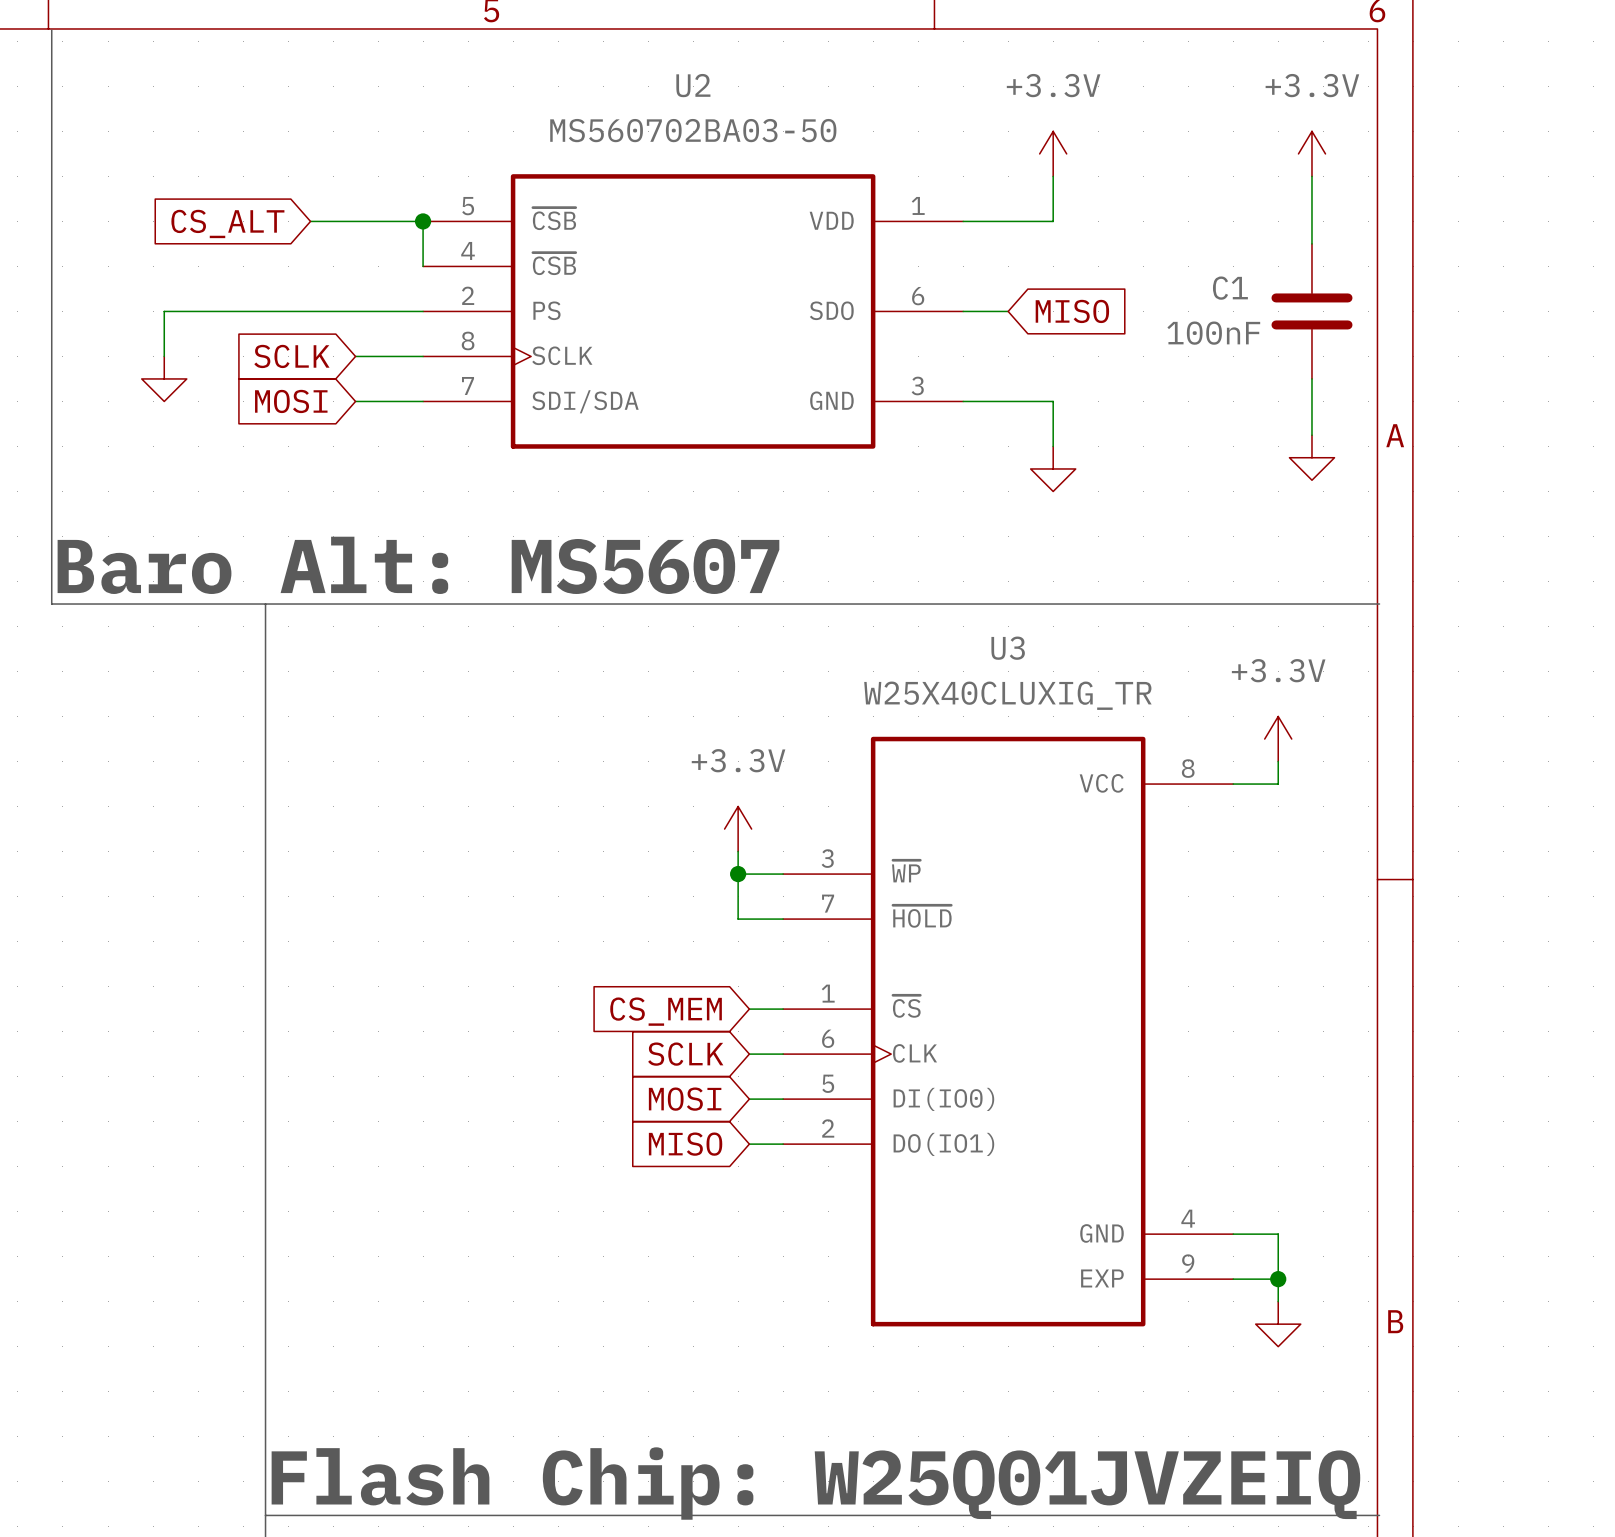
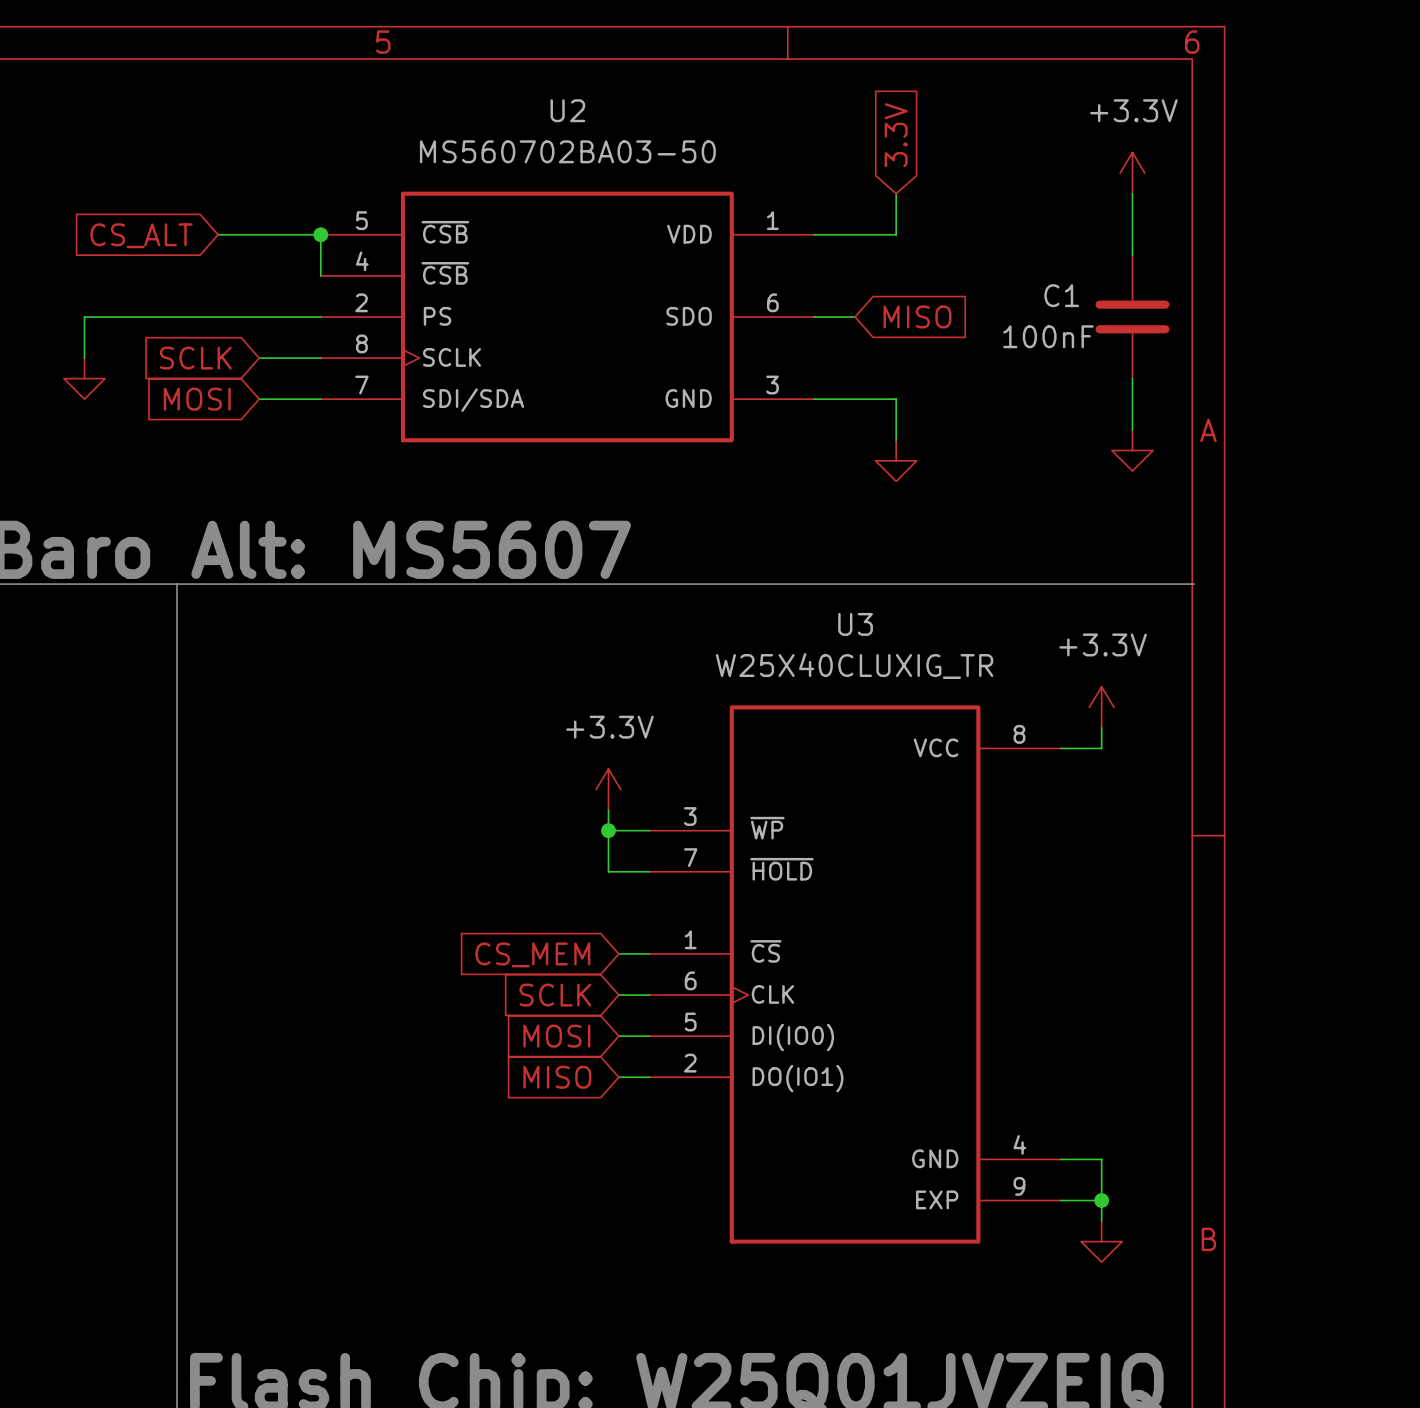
global label: none -> 3.3V (896, 135)
power symbol: +3.3V (1053, 153) -> none

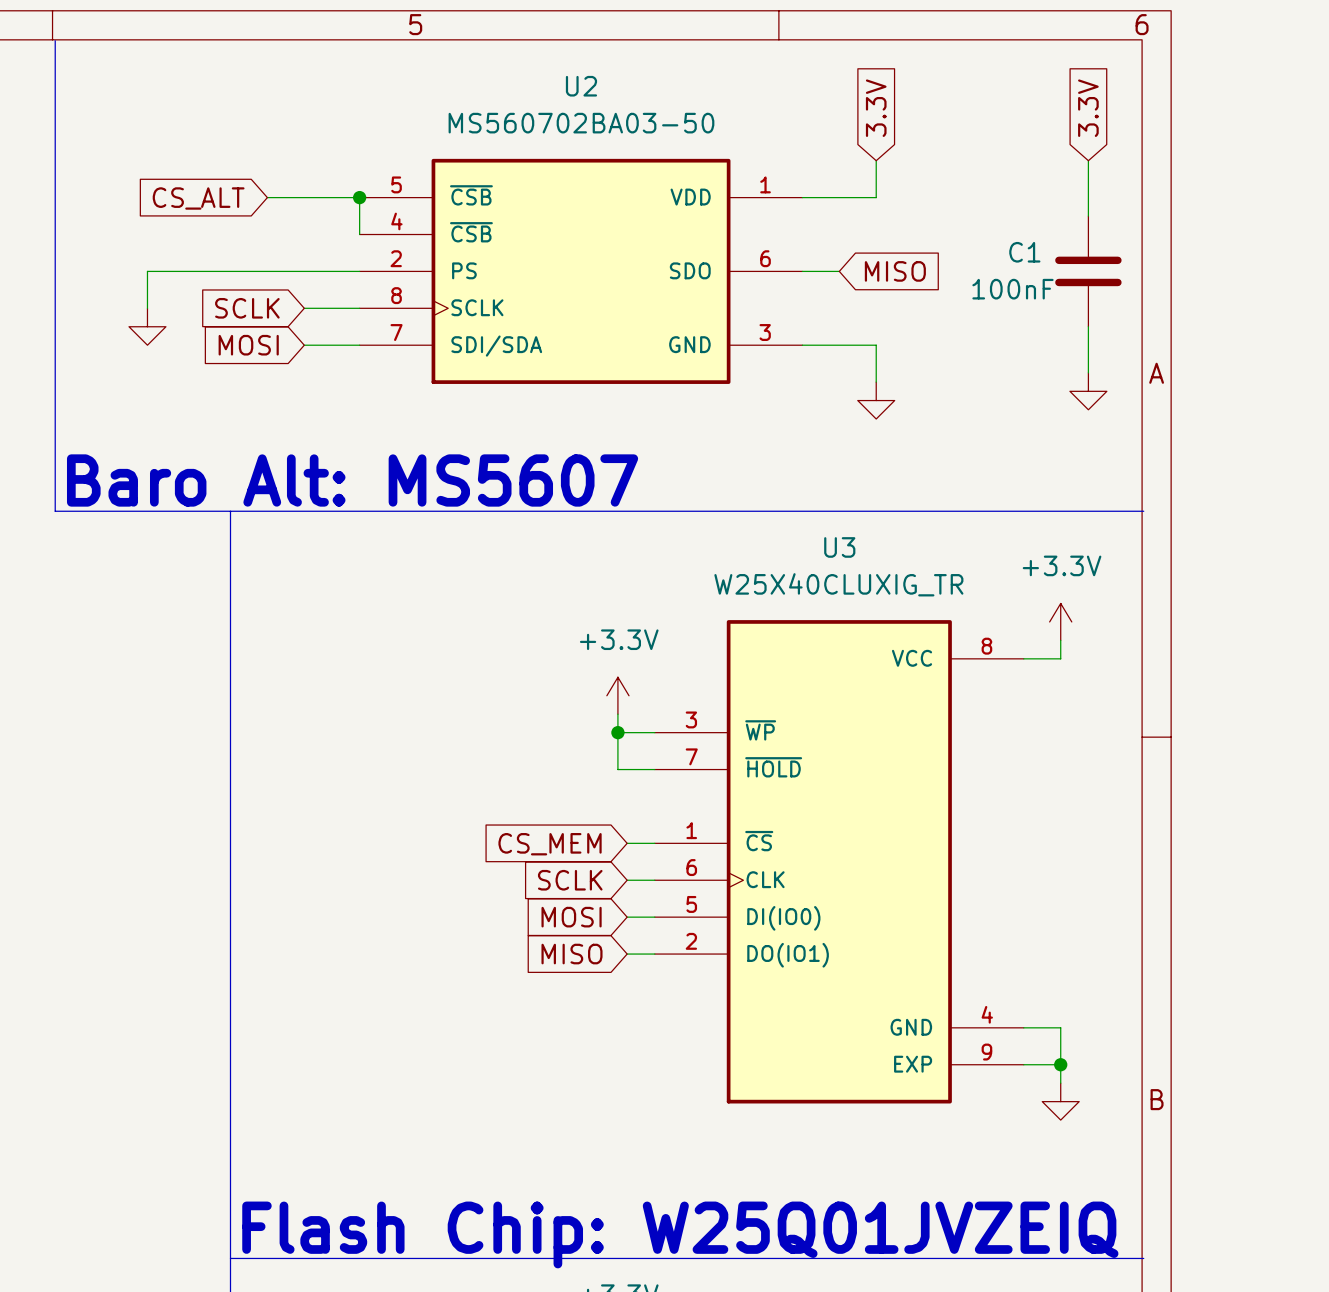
global label: none -> 3.3V (1088, 108)
power symbol: +3.3V (1132, 173) -> none

